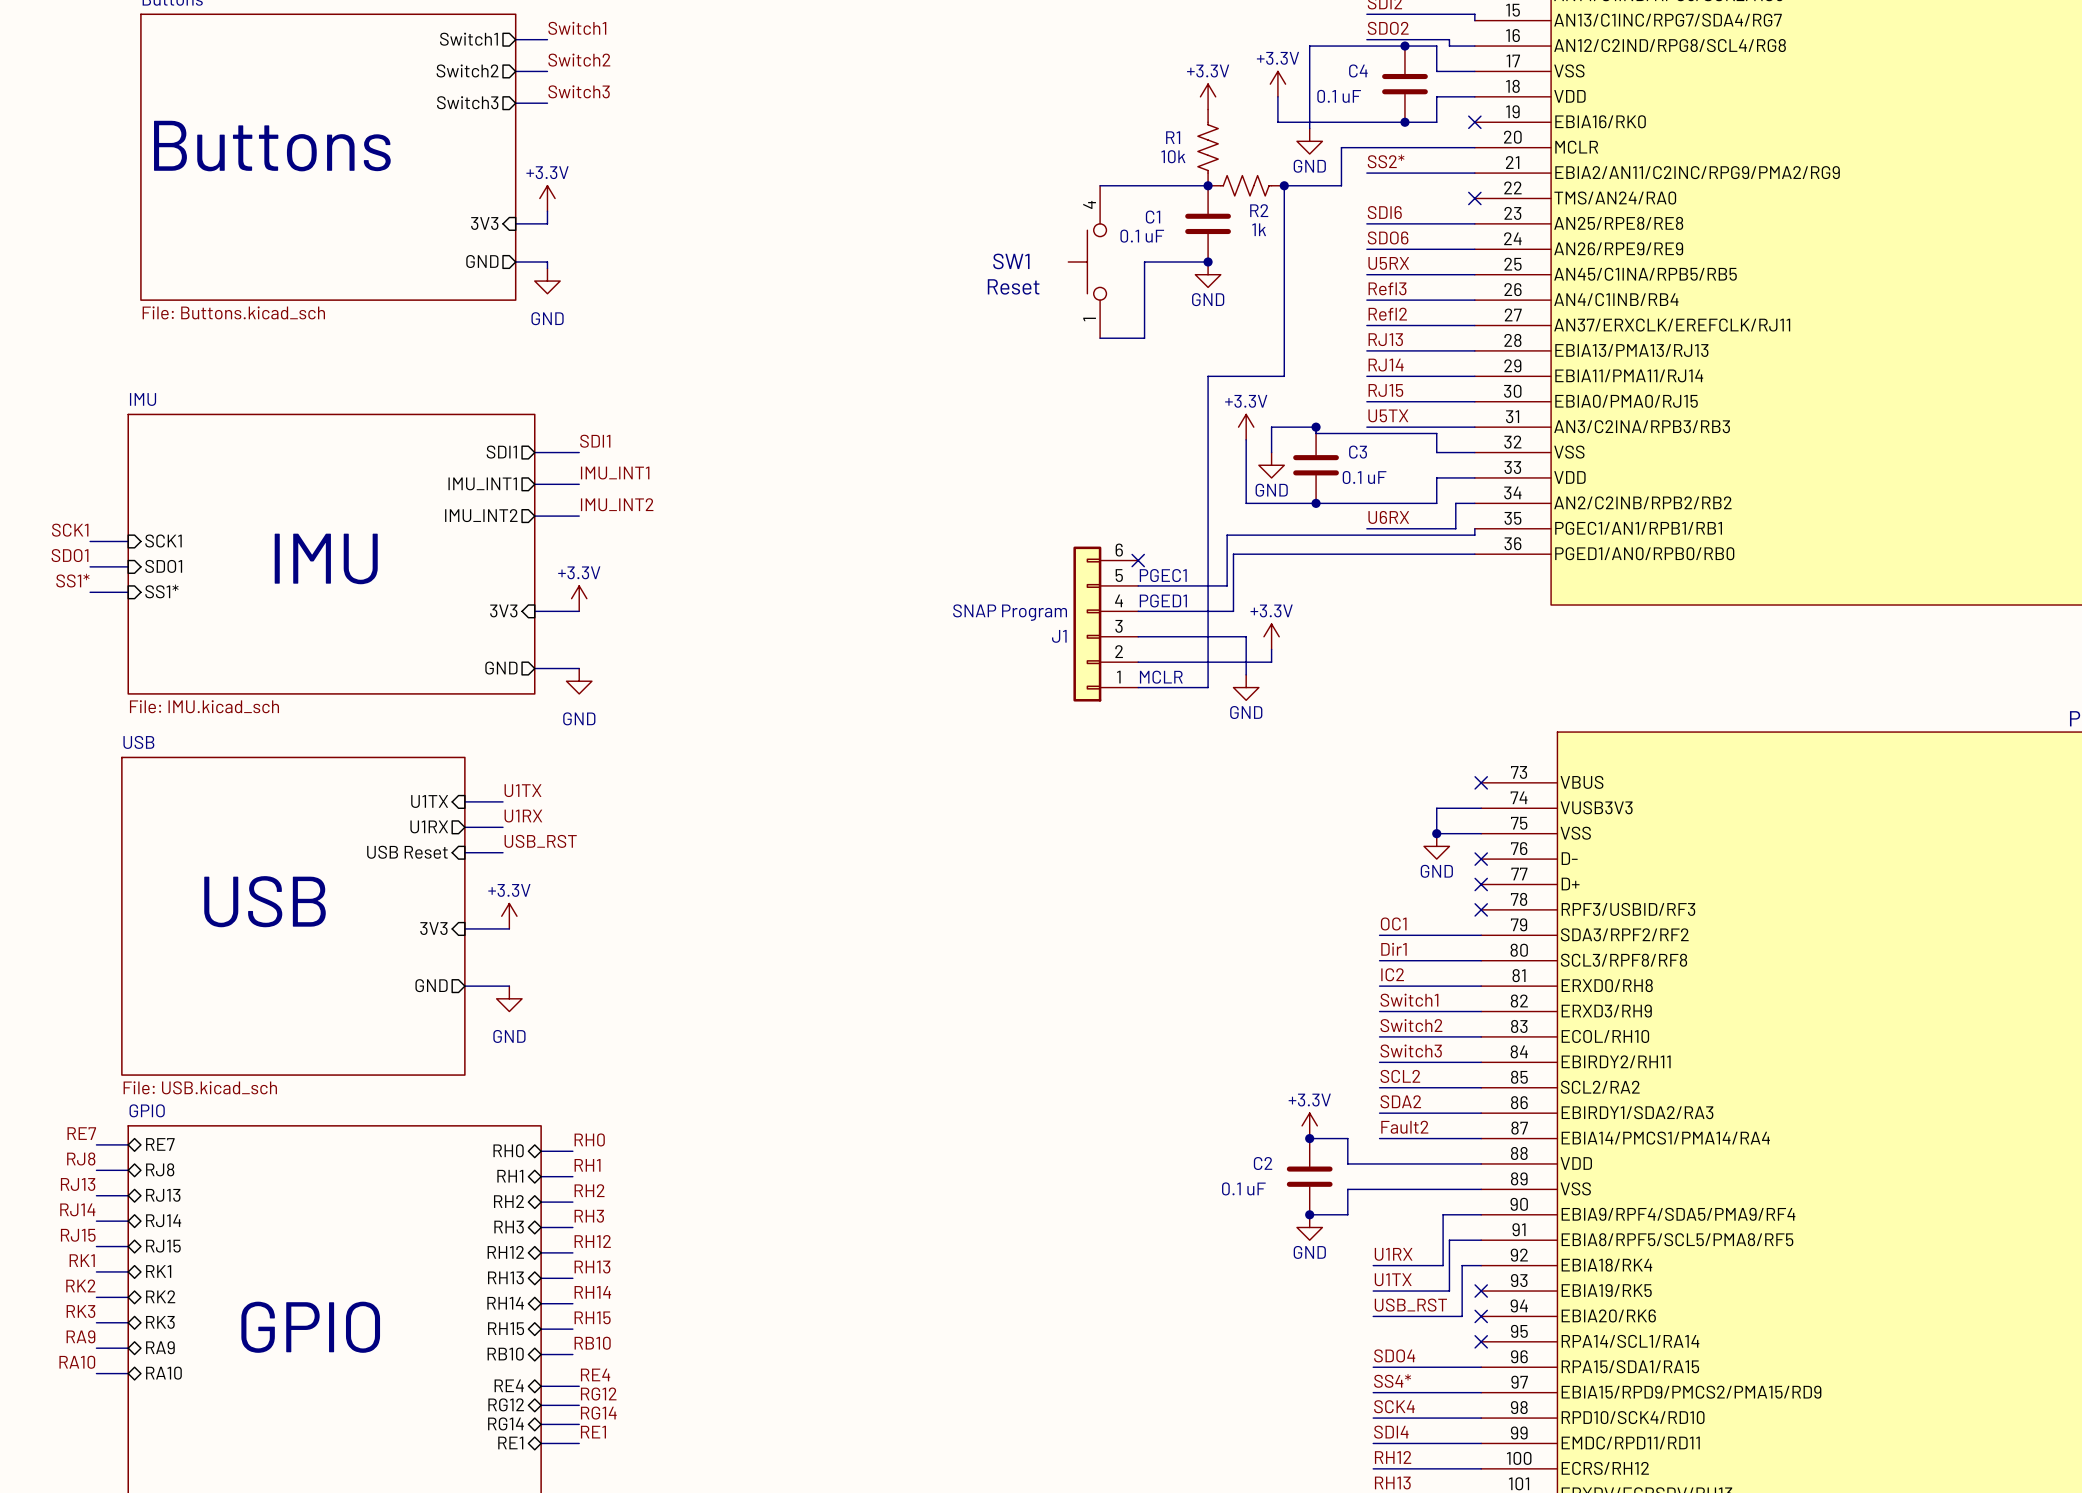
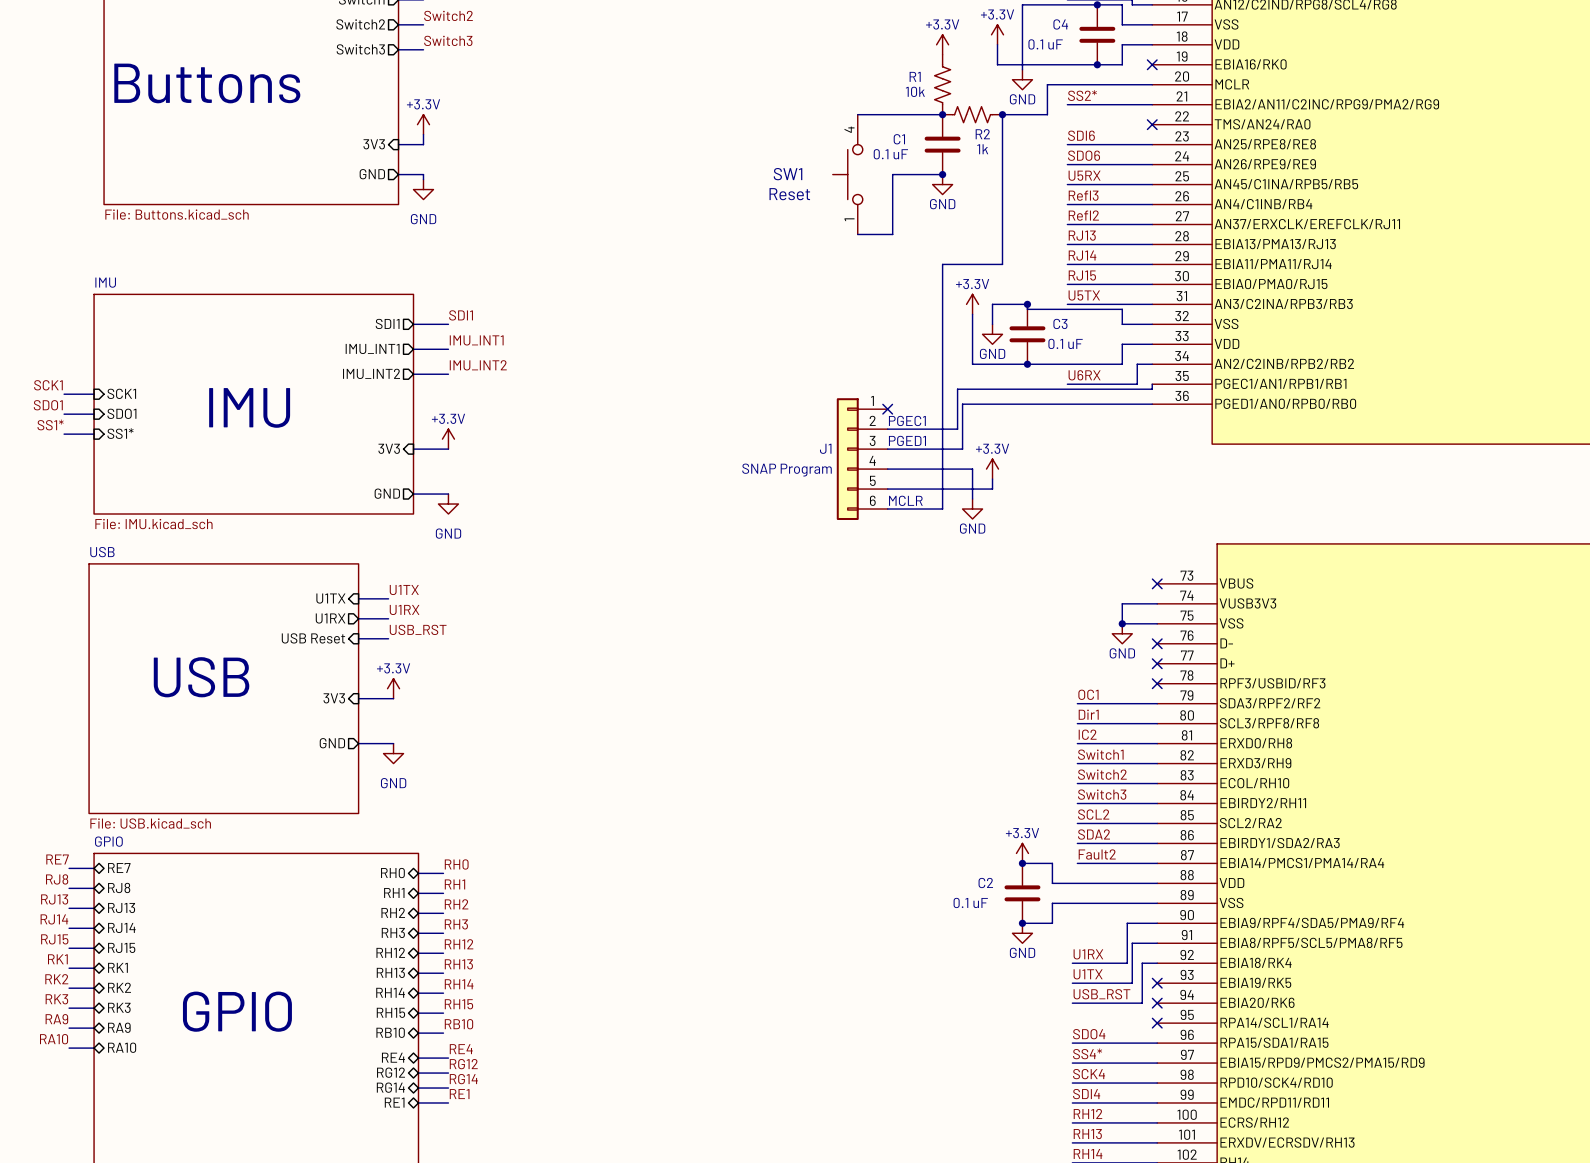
J1 flip: as is (1087, 624) -> up-down (847, 459)

